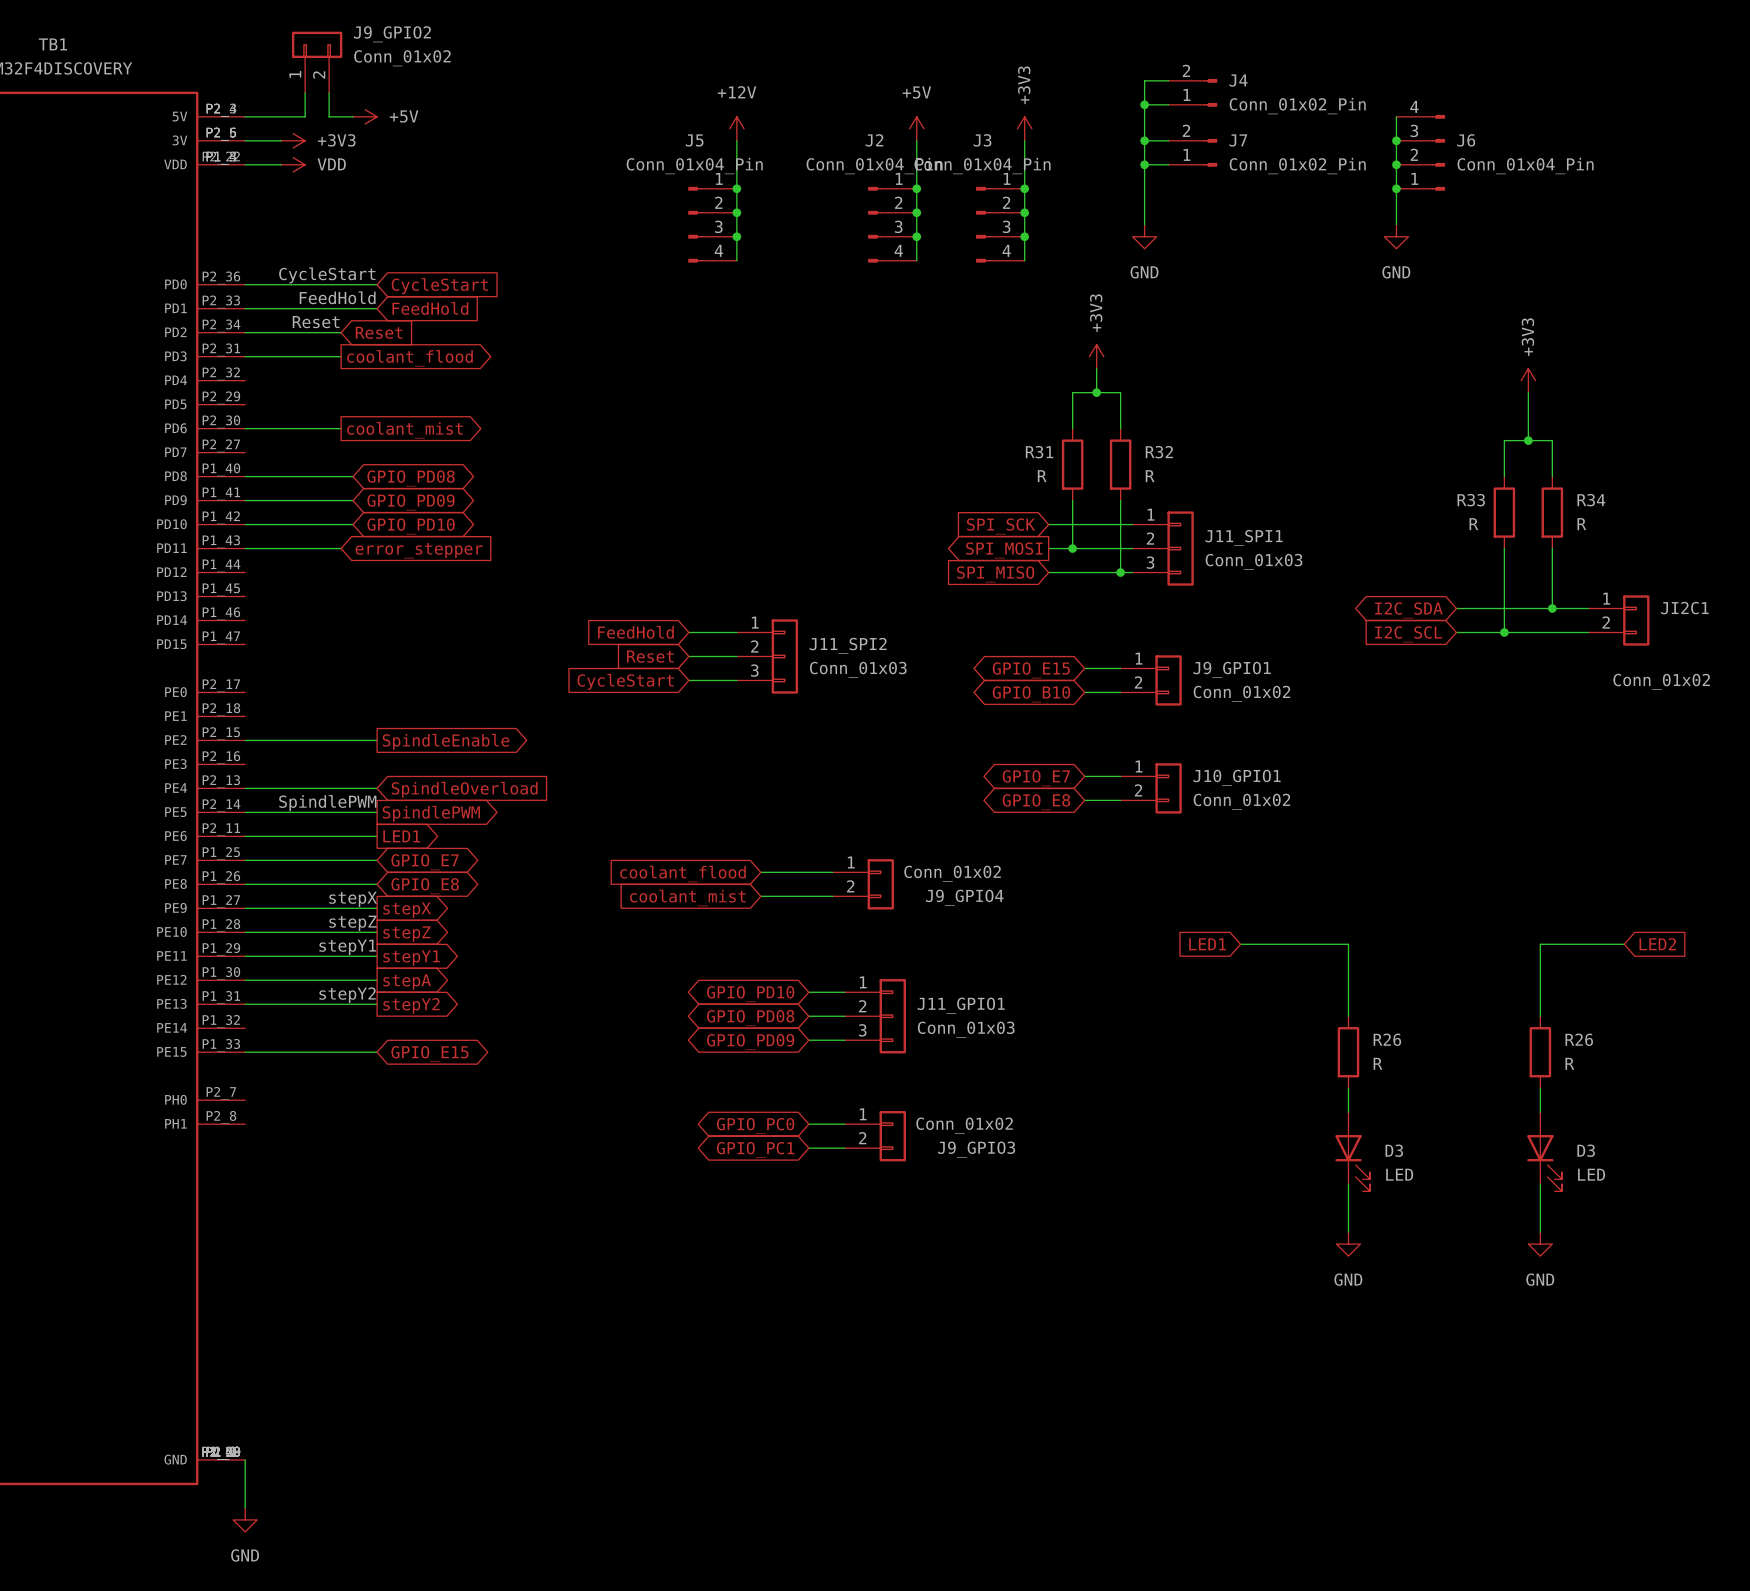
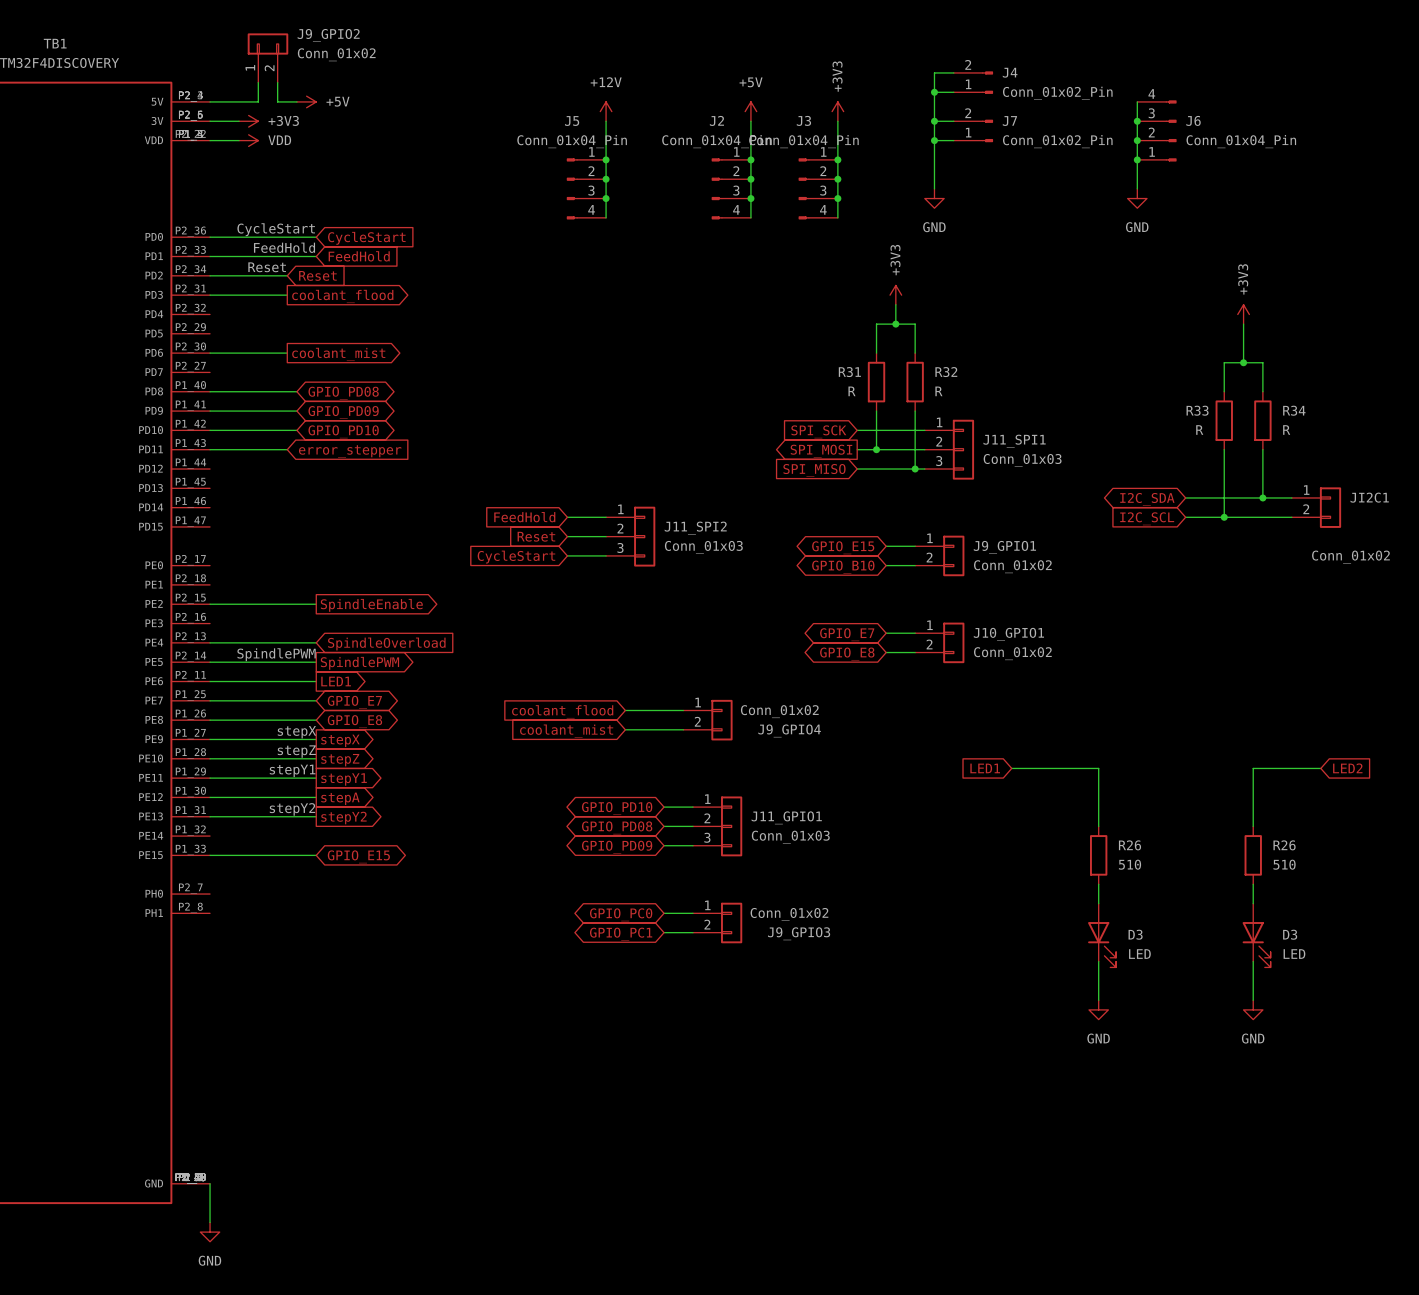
R26 value: R (1377, 1063) -> 510 (1130, 864)
R26 value: R (1569, 1063) -> 510 (1284, 864)

